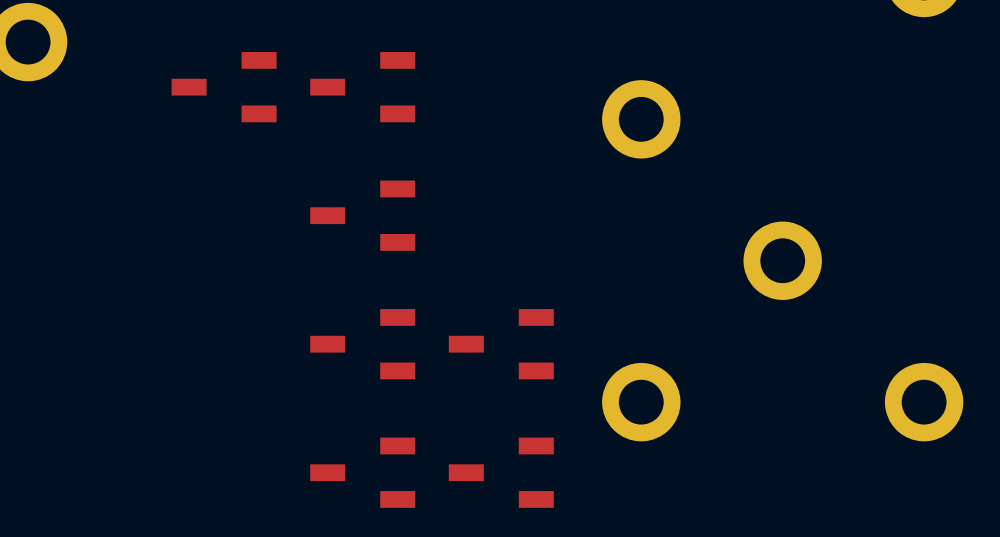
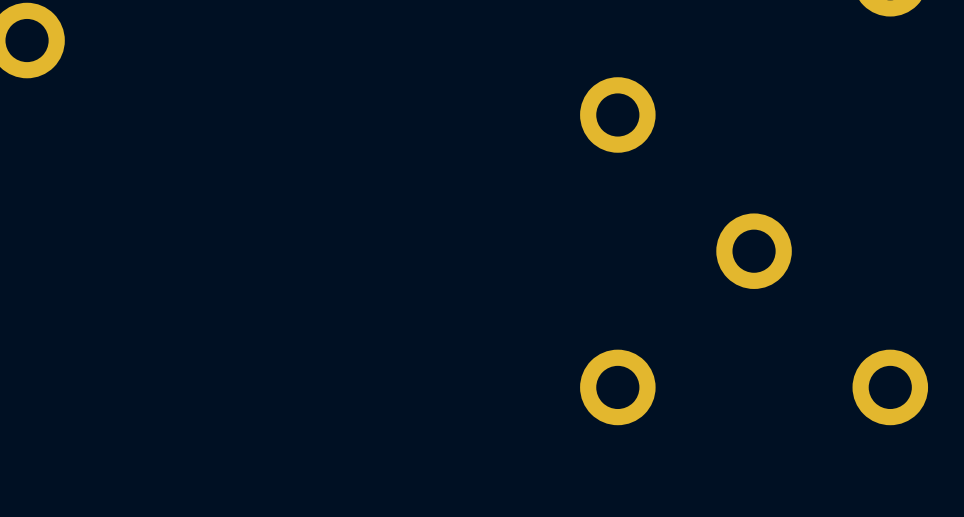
part: (224, 87) -> none
part: (362, 87) -> none
part: (362, 215) -> none
part: (362, 344) -> none
part: (501, 344) -> none
part: (362, 472) -> none
part: (501, 472) -> none

